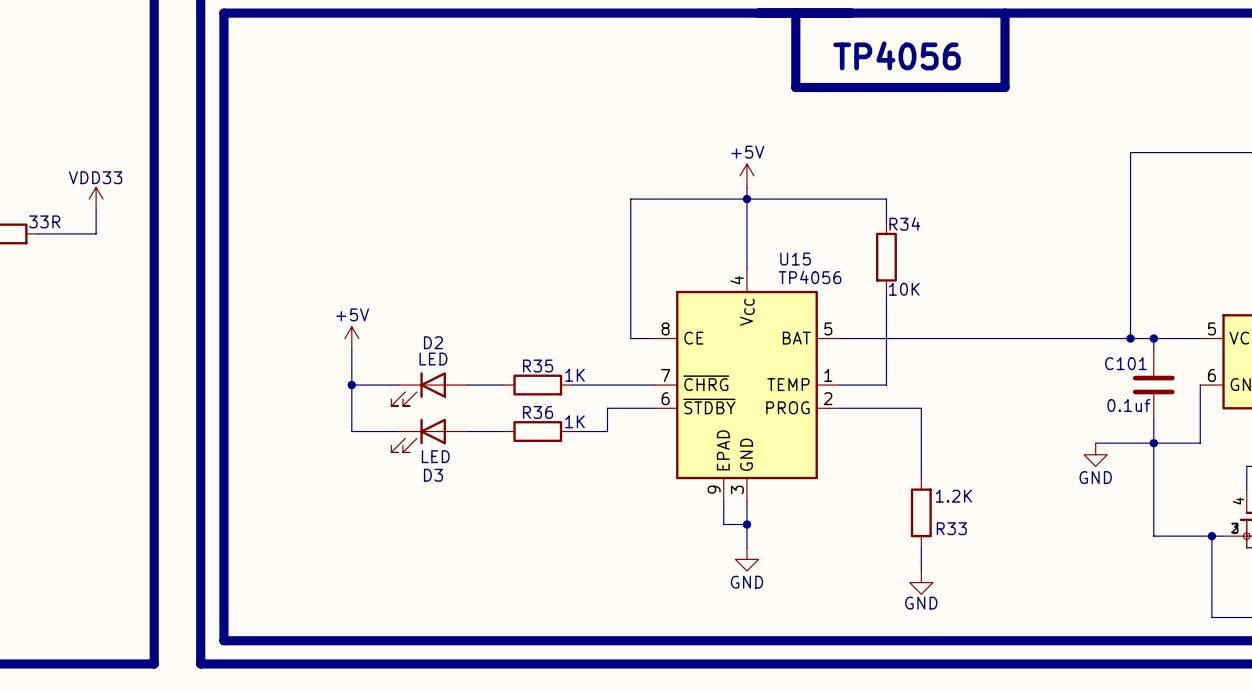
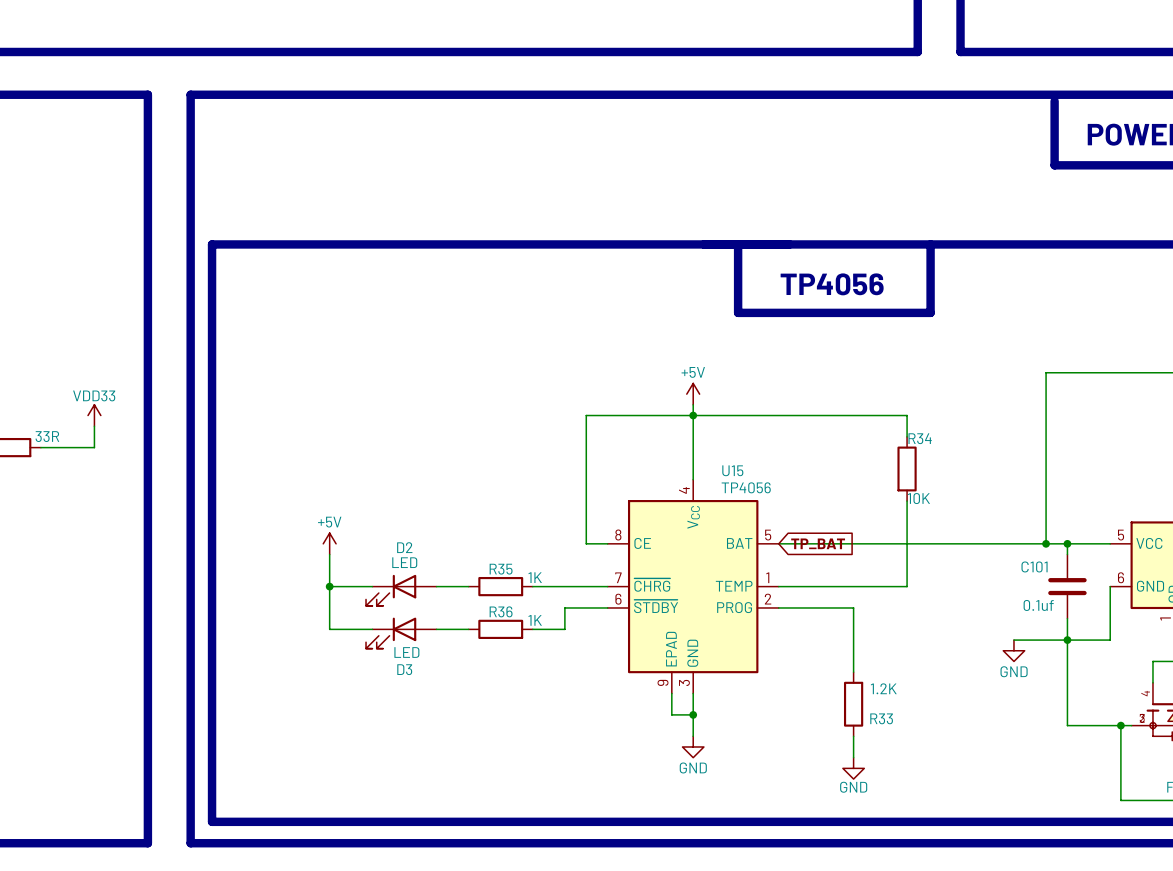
wire: (886, 199) (886, 222) -> (821, 415) (907, 415) (907, 436)
R34 position: (886, 257) -> (907, 468)
wire: (886, 292) (886, 385) -> (907, 501) (907, 586) (821, 586)
global label: none -> TP_BAT (818, 543)

